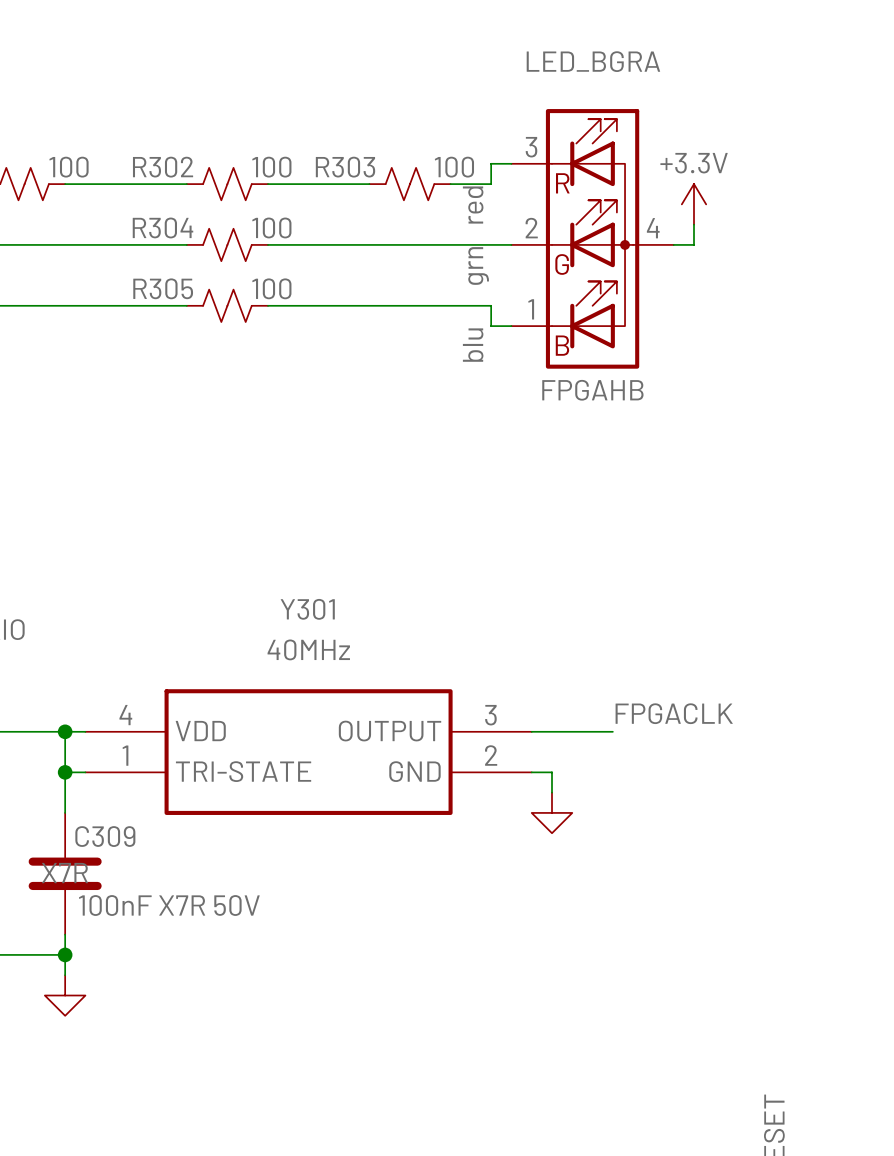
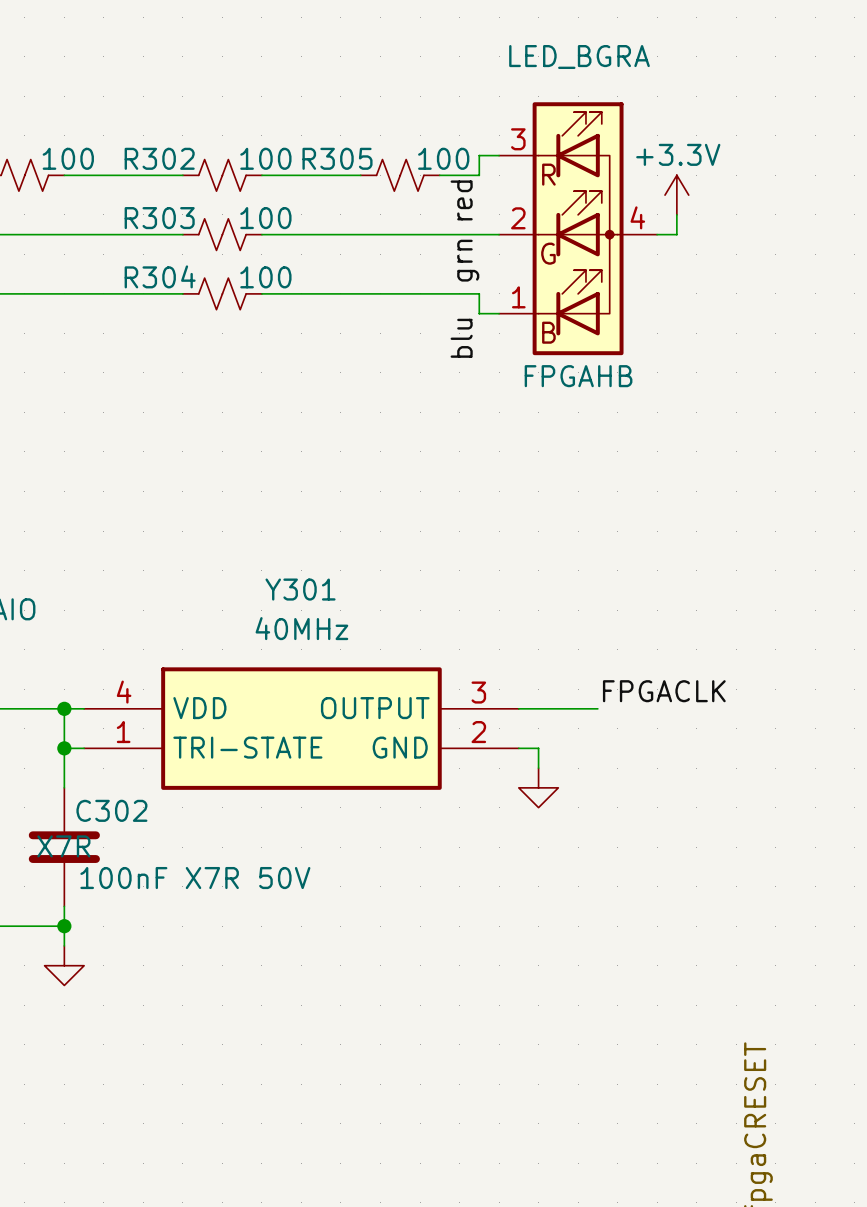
R303 name: R303 (345, 167) -> R305 (337, 158)
R304 name: R304 (163, 227) -> R303 (159, 218)
R305 name: R305 (163, 288) -> R304 (160, 276)
C309 name: C309 (105, 836) -> C302 (111, 810)

